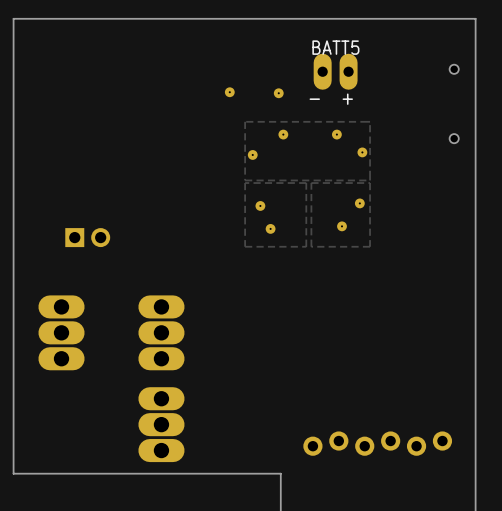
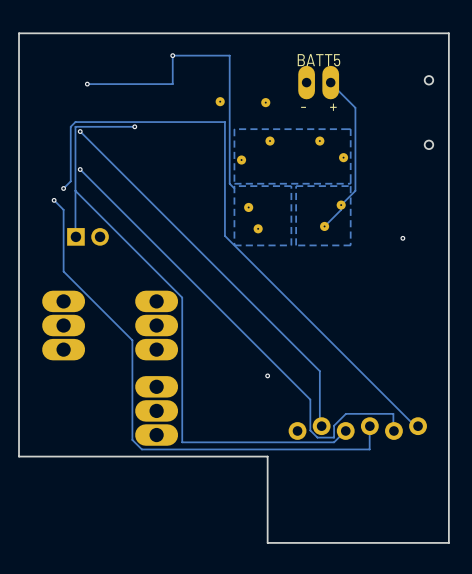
via: none -> (172, 55)
track: none -> (330, 82) (355, 107) (355, 190) (341, 205) (341, 209) (324, 226)
track: none -> (87, 84) (172, 84) (172, 55) (229, 55) (229, 183) (234, 188)
via: none -> (87, 84)
track: none -> (134, 126) (75, 126) (75, 236)
via: none -> (134, 126)
track: none -> (80, 131) (319, 371) (319, 425) (321, 426)
via: none -> (80, 131)
track: none -> (80, 169) (310, 399) (310, 430) (317, 437) (334, 437) (334, 425) (345, 413) (393, 413) (393, 430)
via: none -> (80, 169)
track: none -> (63, 188) (70, 181) (70, 126) (75, 122) (224, 122) (224, 235) (417, 428) (418, 426)
via: none -> (63, 188)
track: none -> (75, 190) (182, 297) (182, 442) (334, 442) (345, 430)
track: none -> (54, 200) (63, 209) (63, 271) (132, 340) (132, 439) (141, 449) (369, 449) (369, 426)
via: none -> (54, 200)
via: none -> (402, 238)
via: none -> (267, 375)

